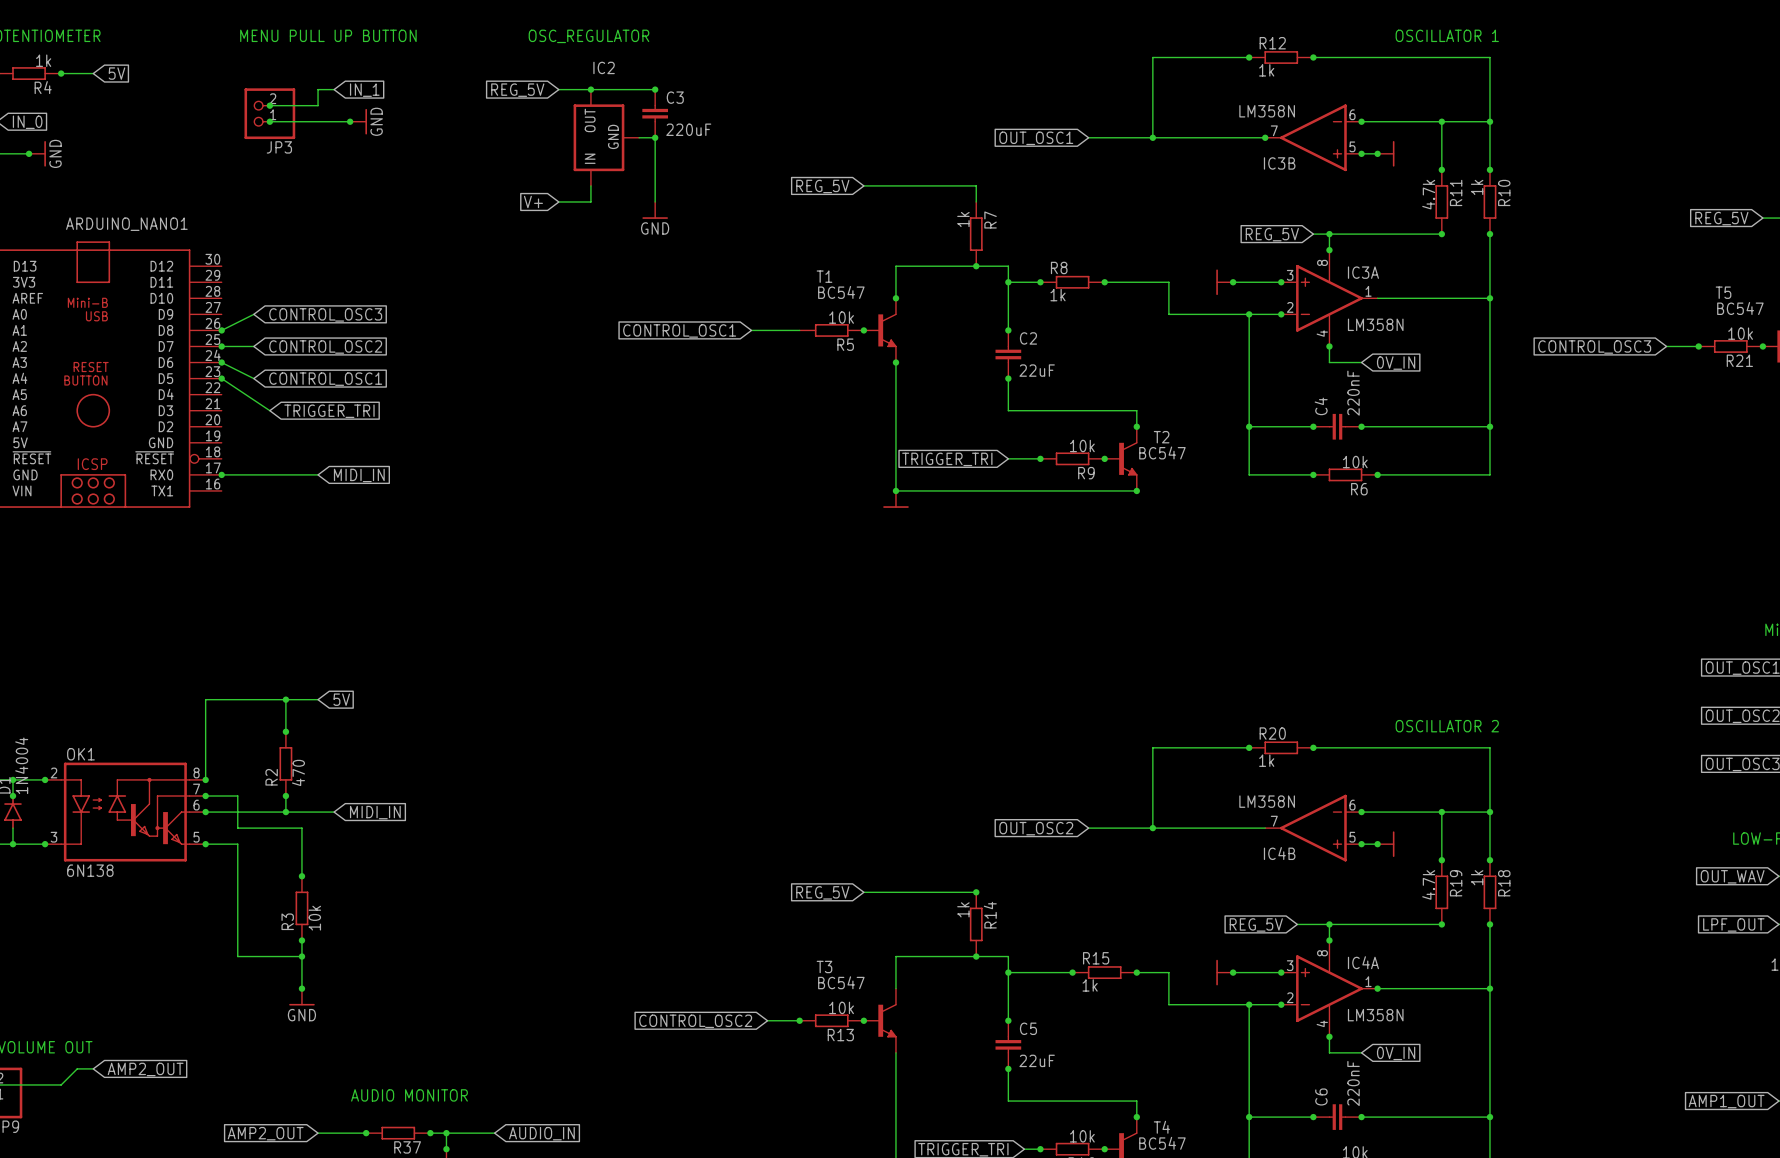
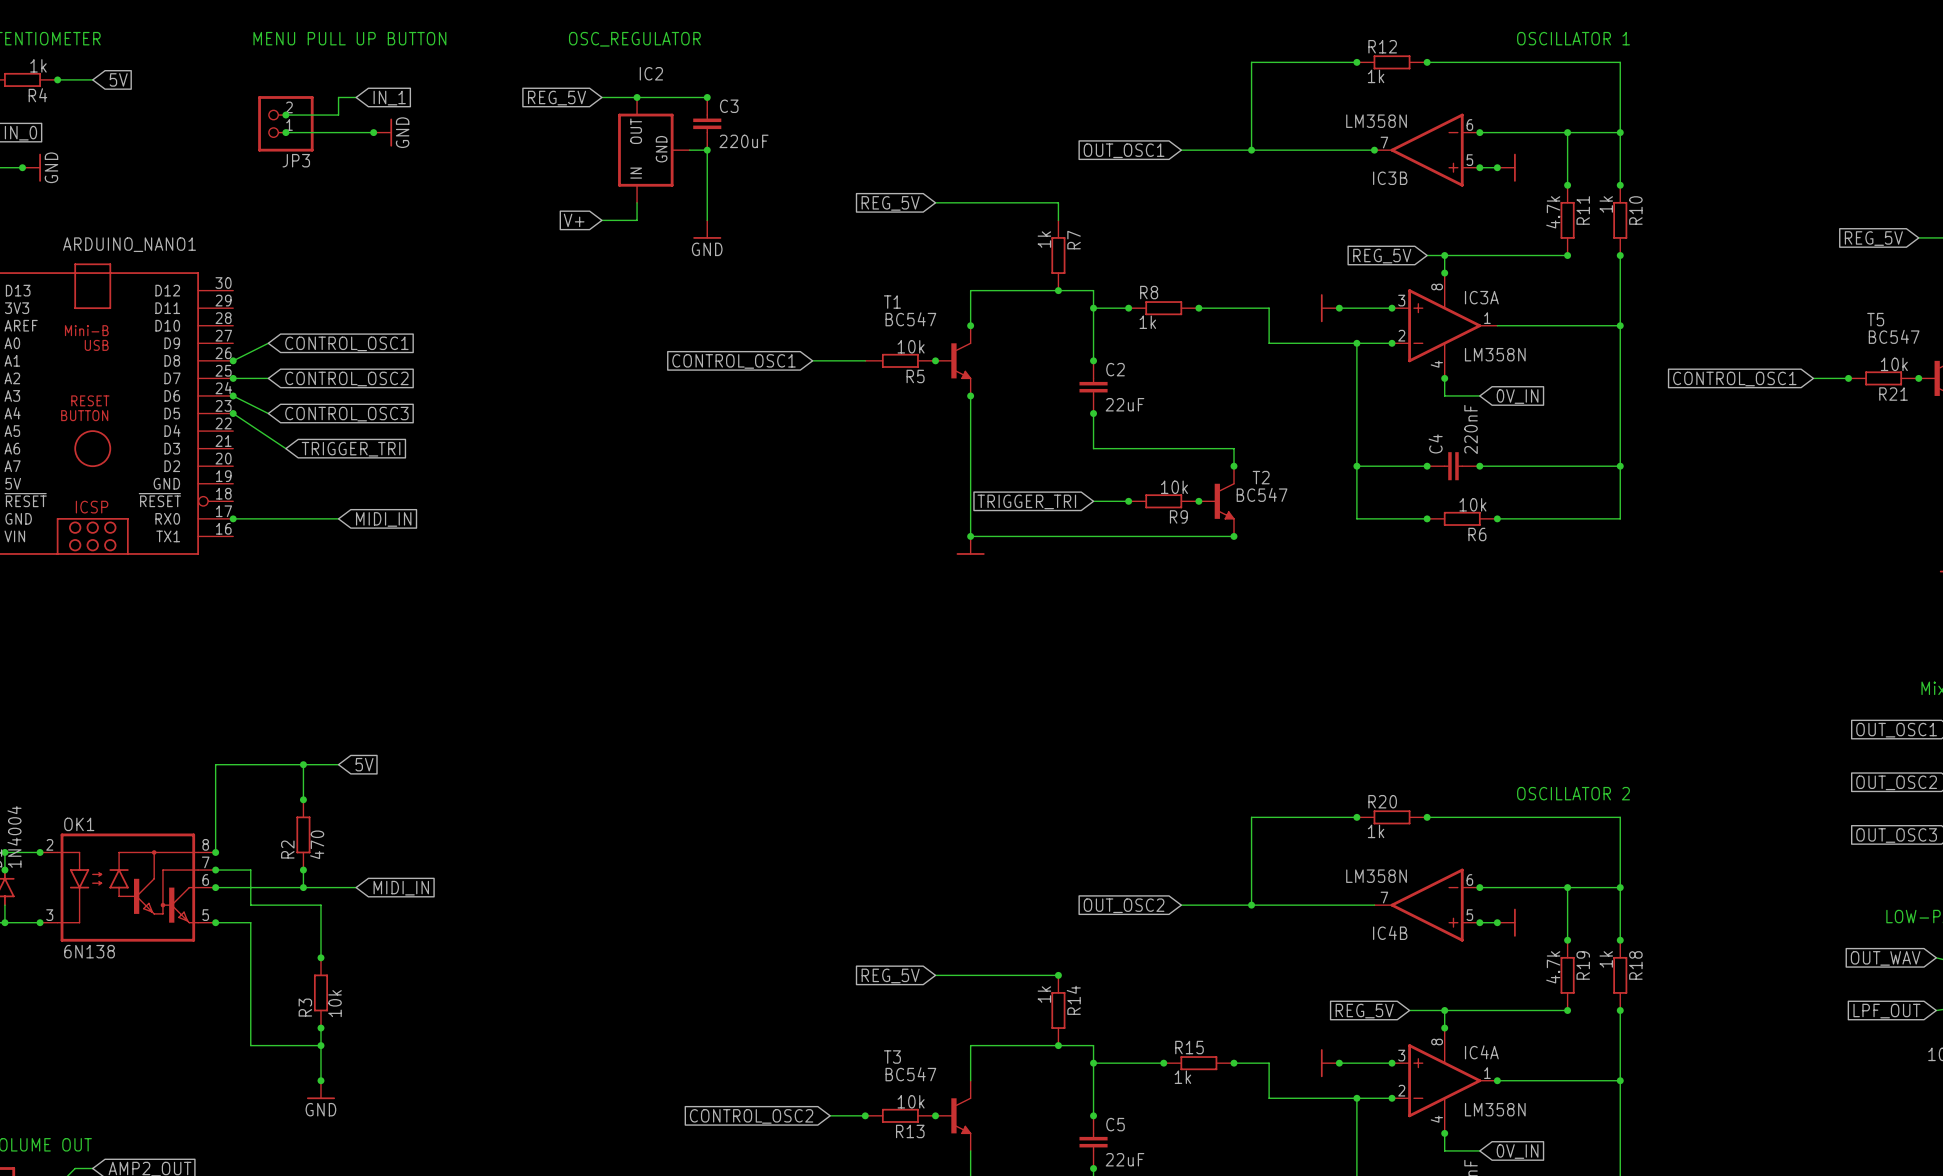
global label: CONTROL_OSC3 (325, 314) -> CONTROL_OSC1 (346, 343)
global label: CONTROL_OSC3 (1594, 347) -> CONTROL_OSC1 (1734, 378)
global label: CONTROL_OSC1 (325, 379) -> CONTROL_OSC3 (346, 414)

